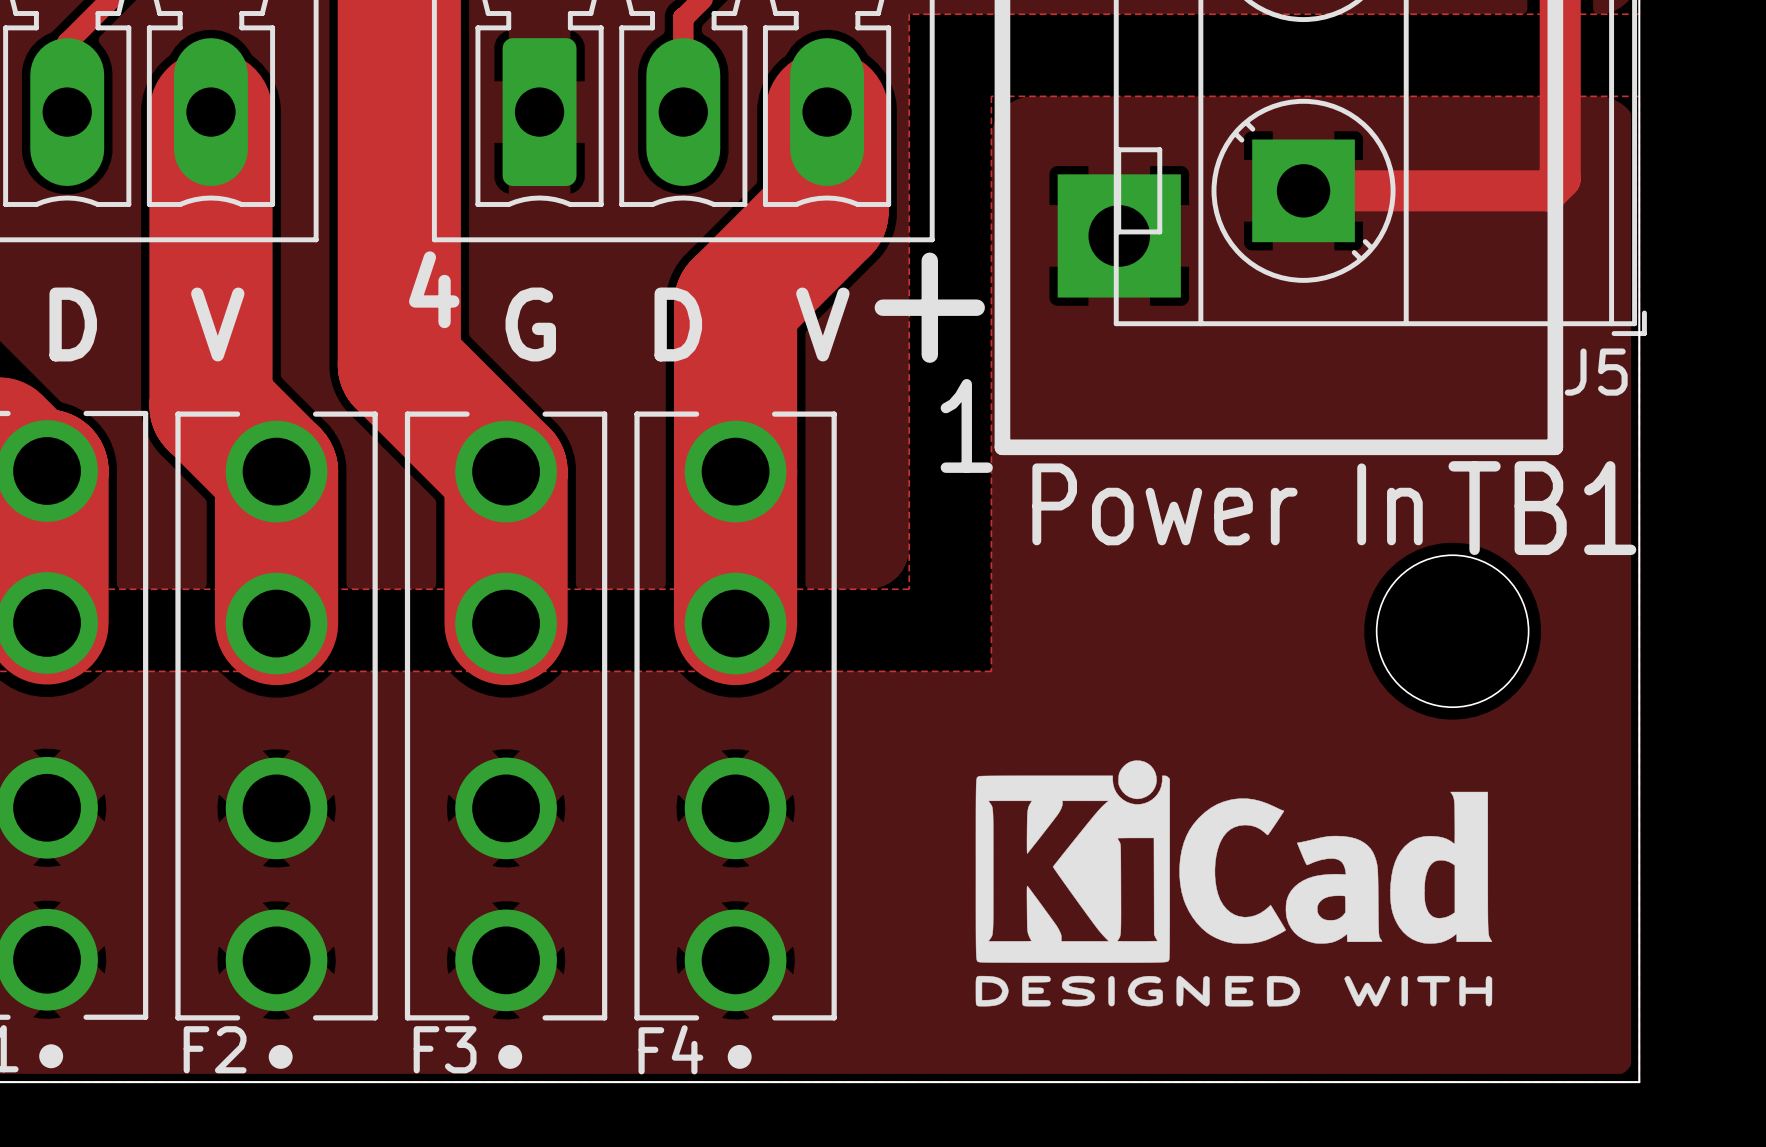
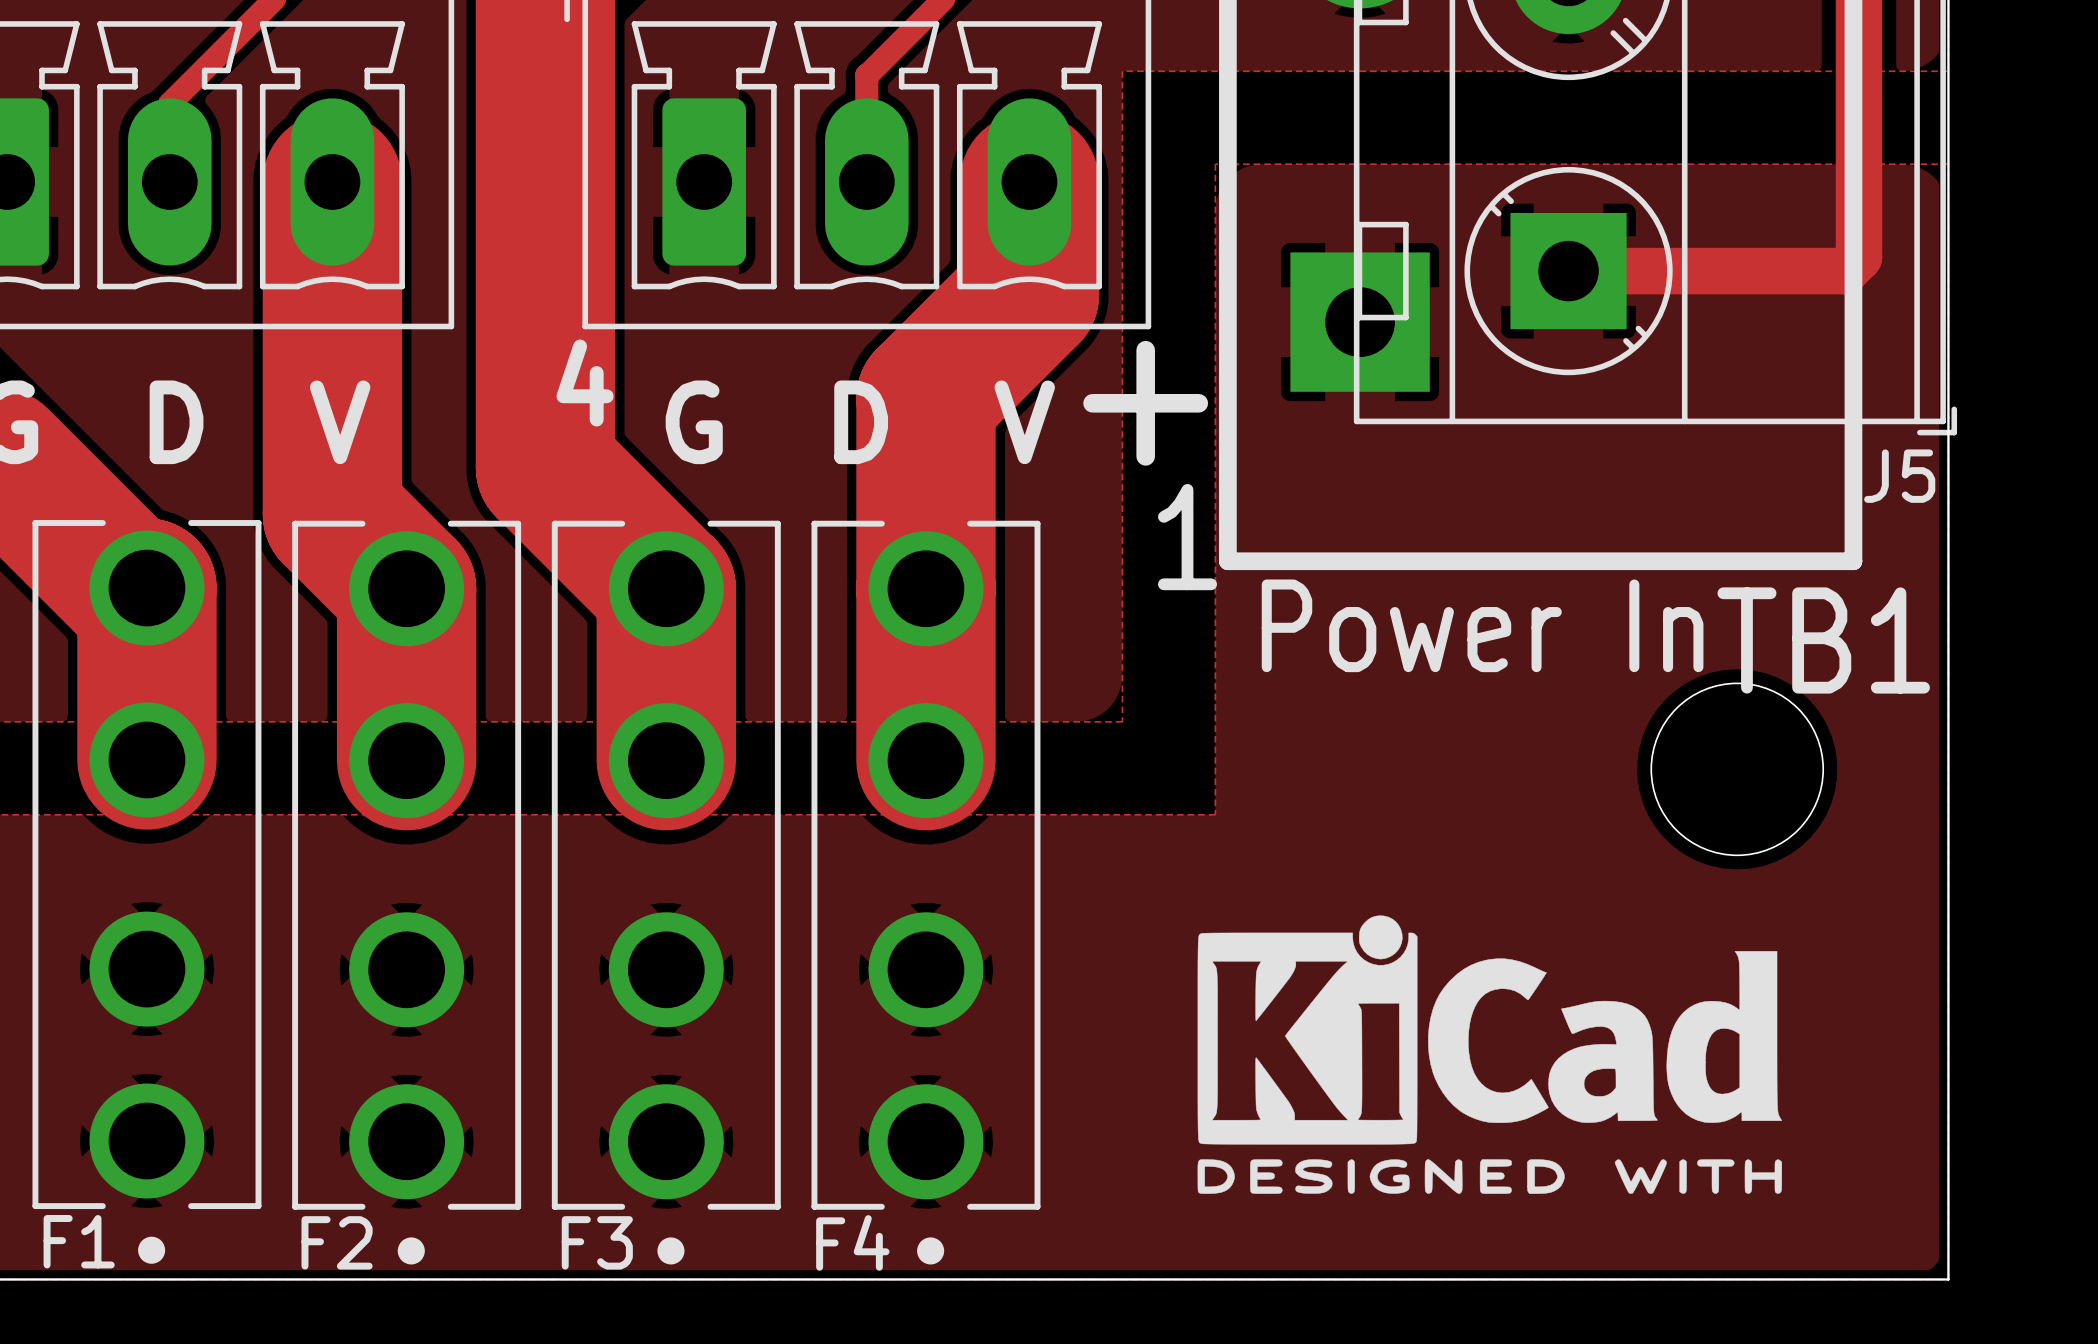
TB1 name position: TB1 (1542, 508) -> TB1 (1823, 640)

